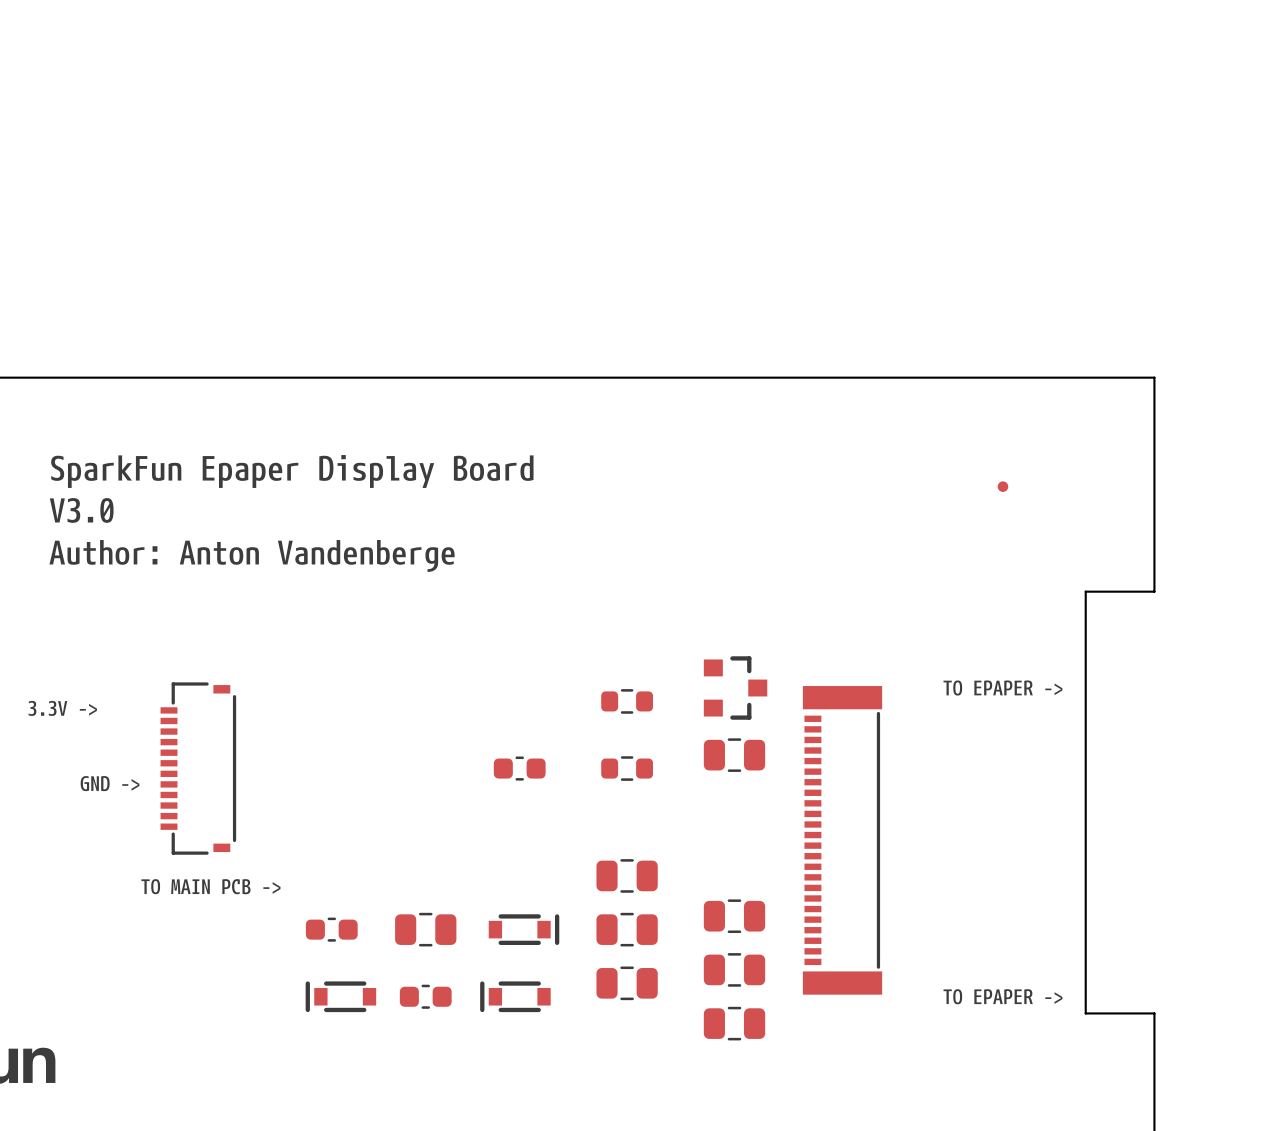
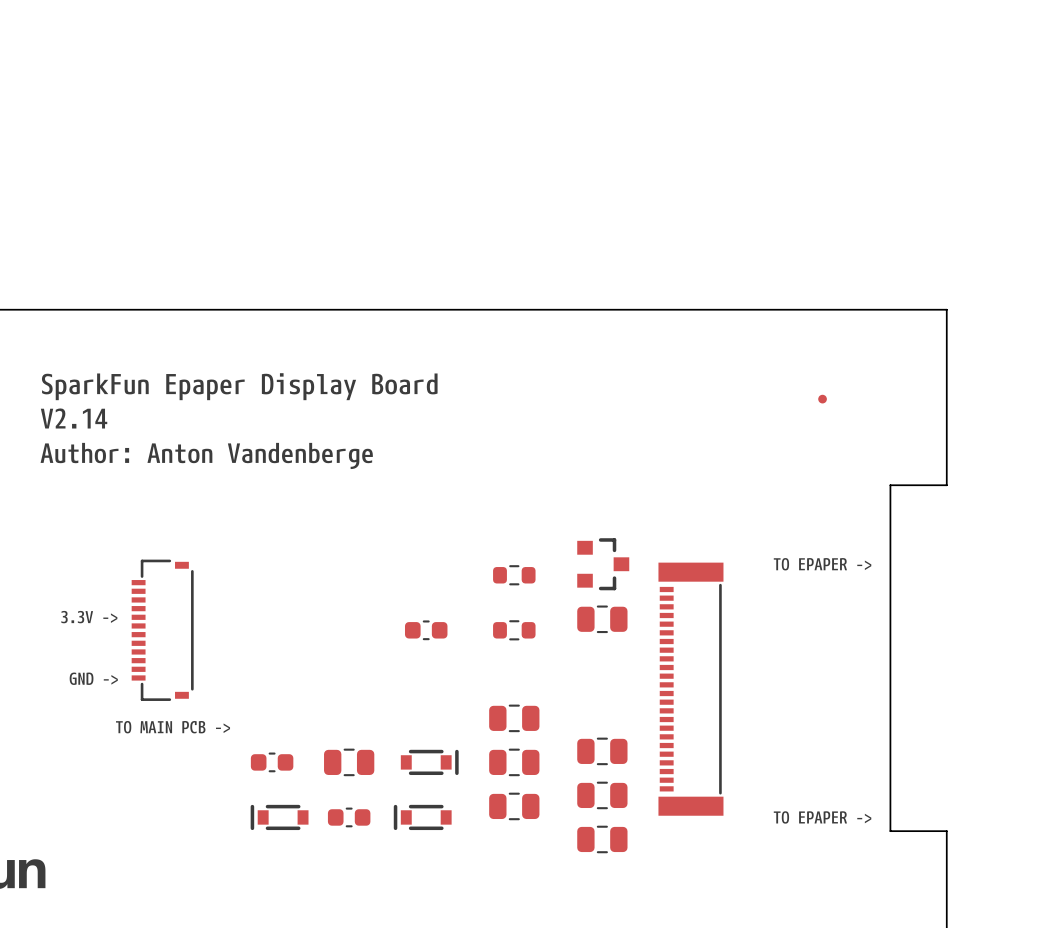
drawing shape: [49, 455, 534, 572] -> [40, 373, 438, 470]
drawing position: (62, 708) -> (89, 617)
drawing position: (110, 783) -> (93, 678)

